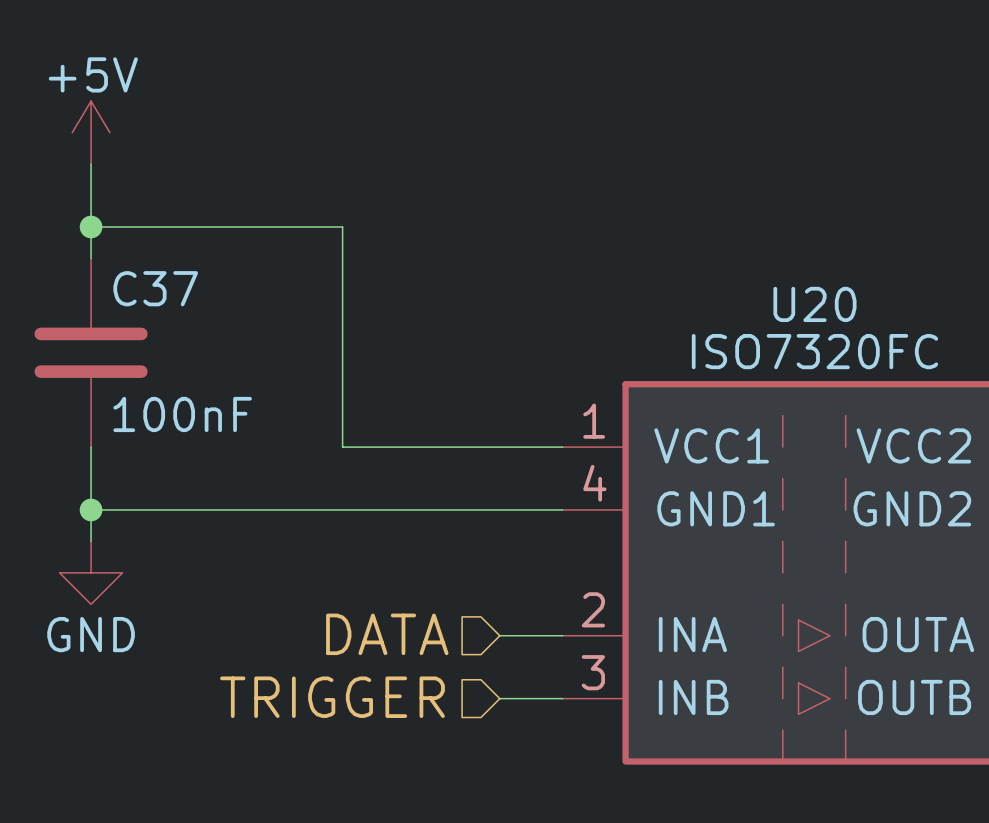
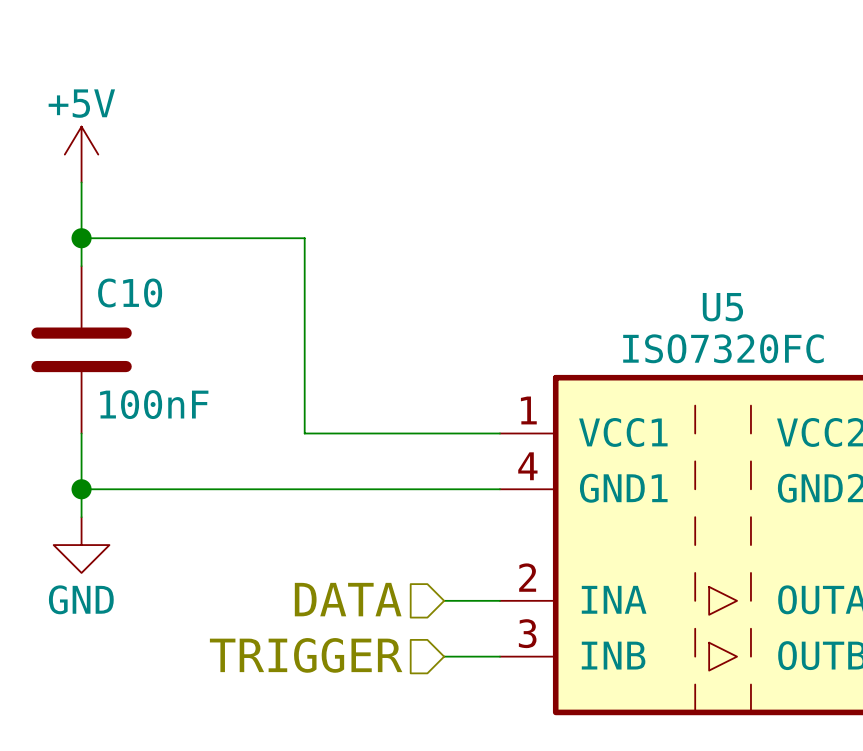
C37 name: C37 (155, 288) -> C10 (130, 293)
U20 name: U20 (814, 304) -> U5 (722, 307)

